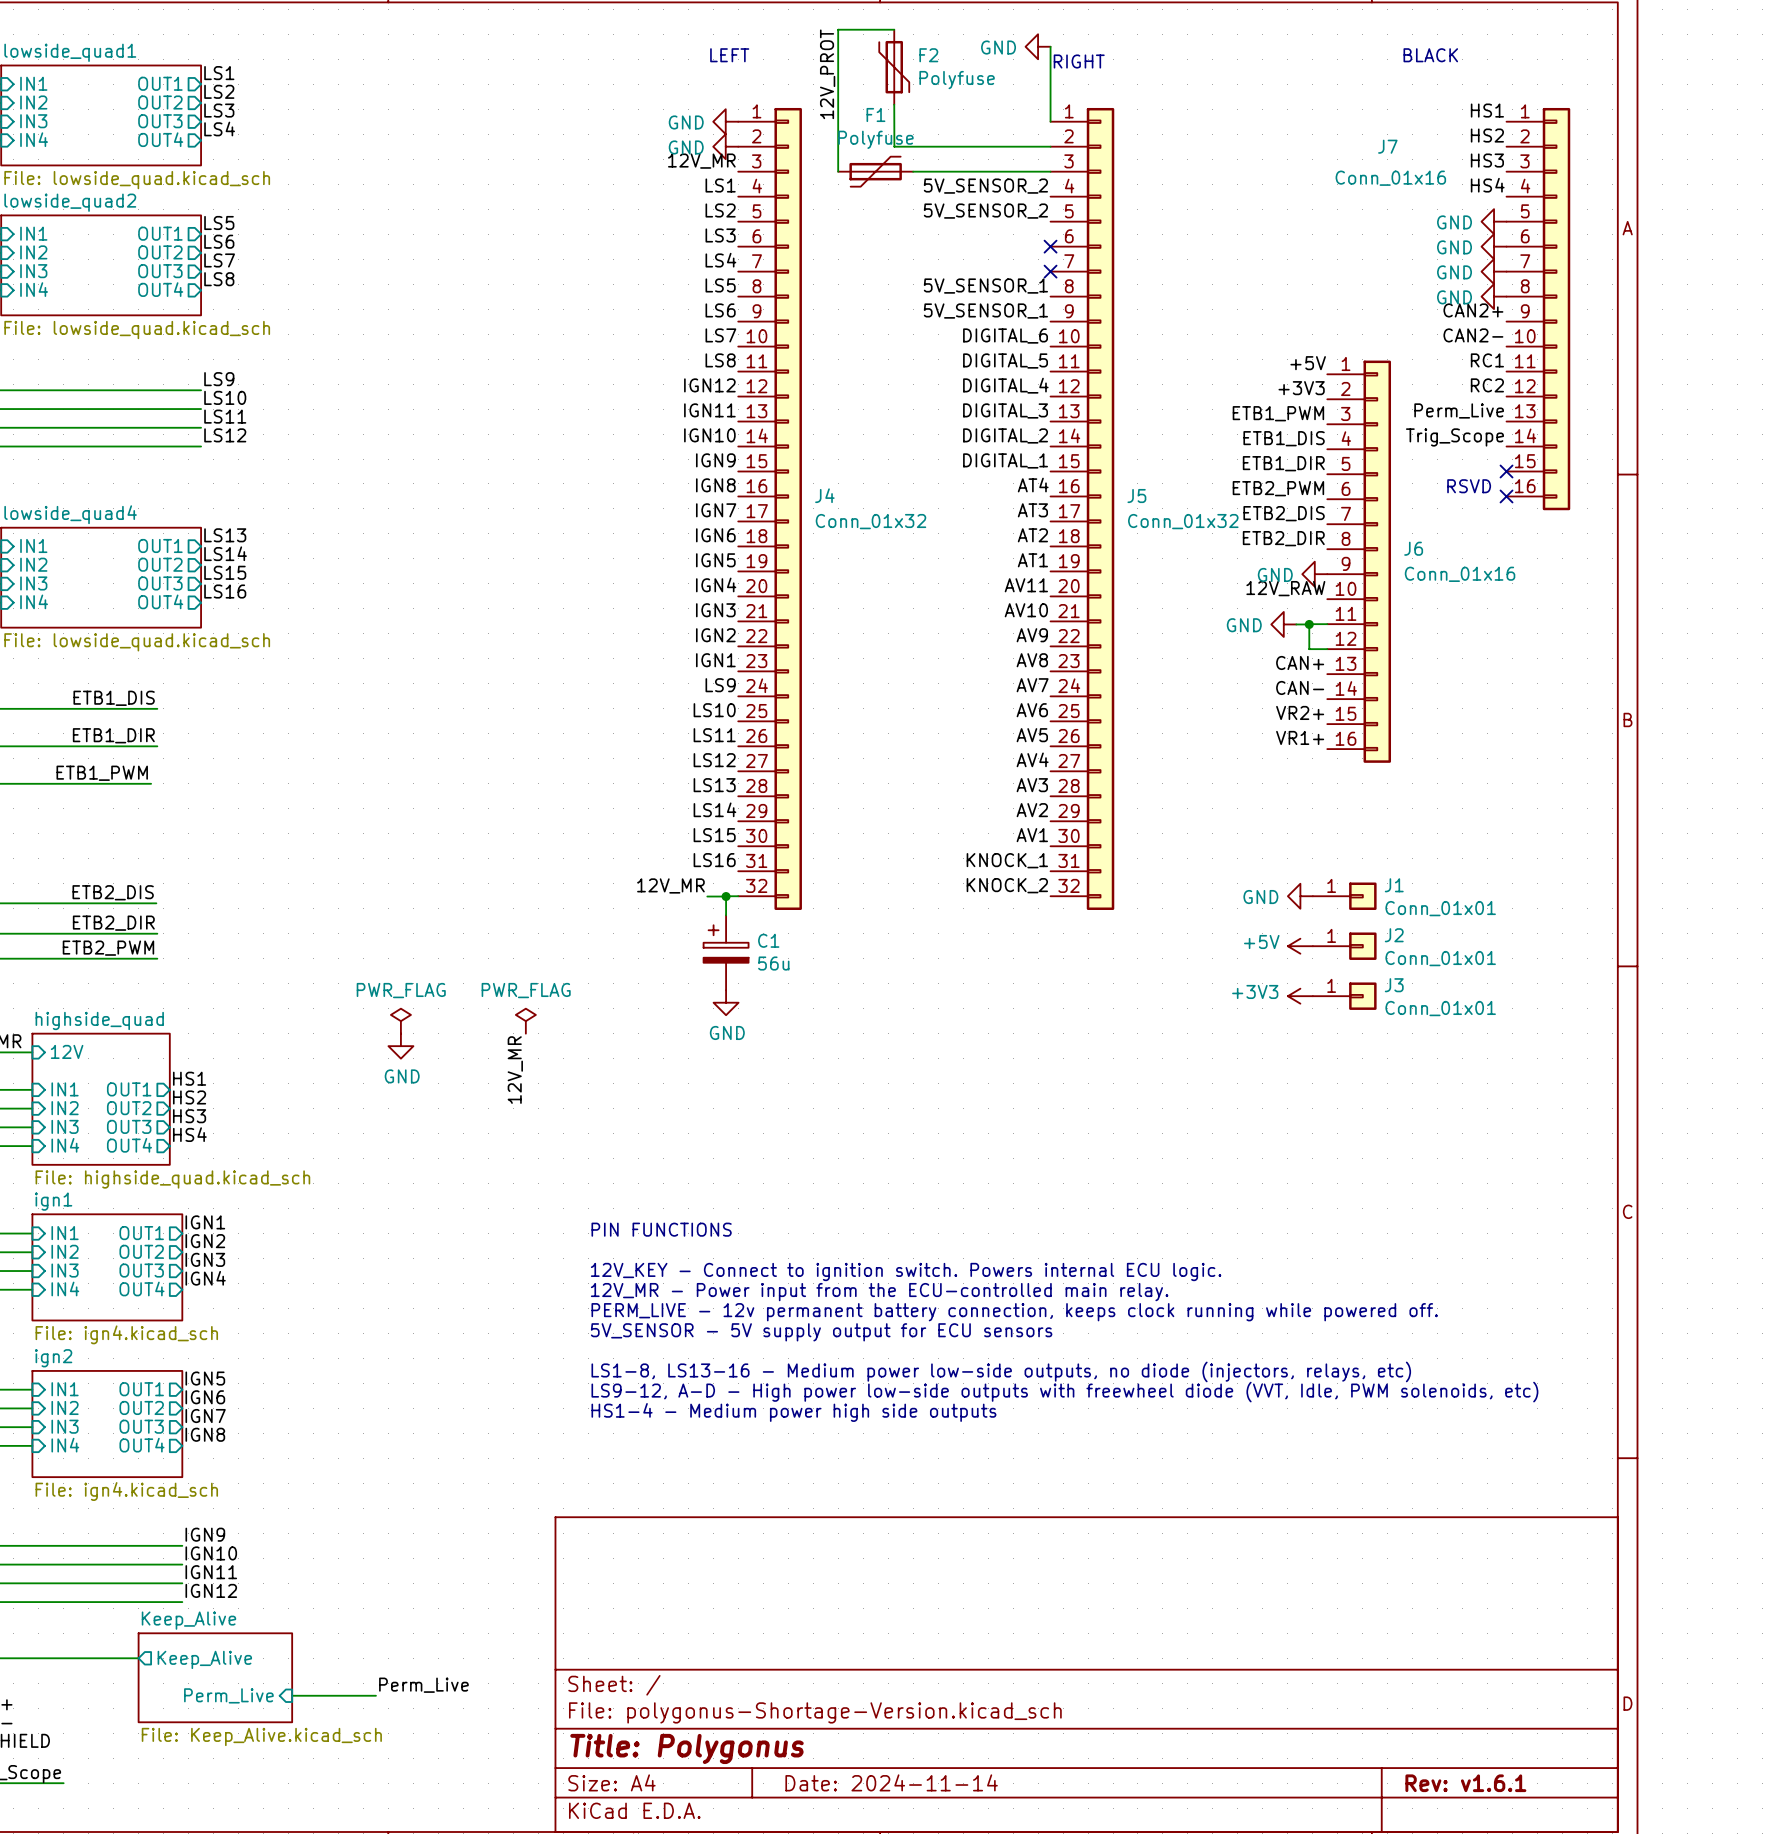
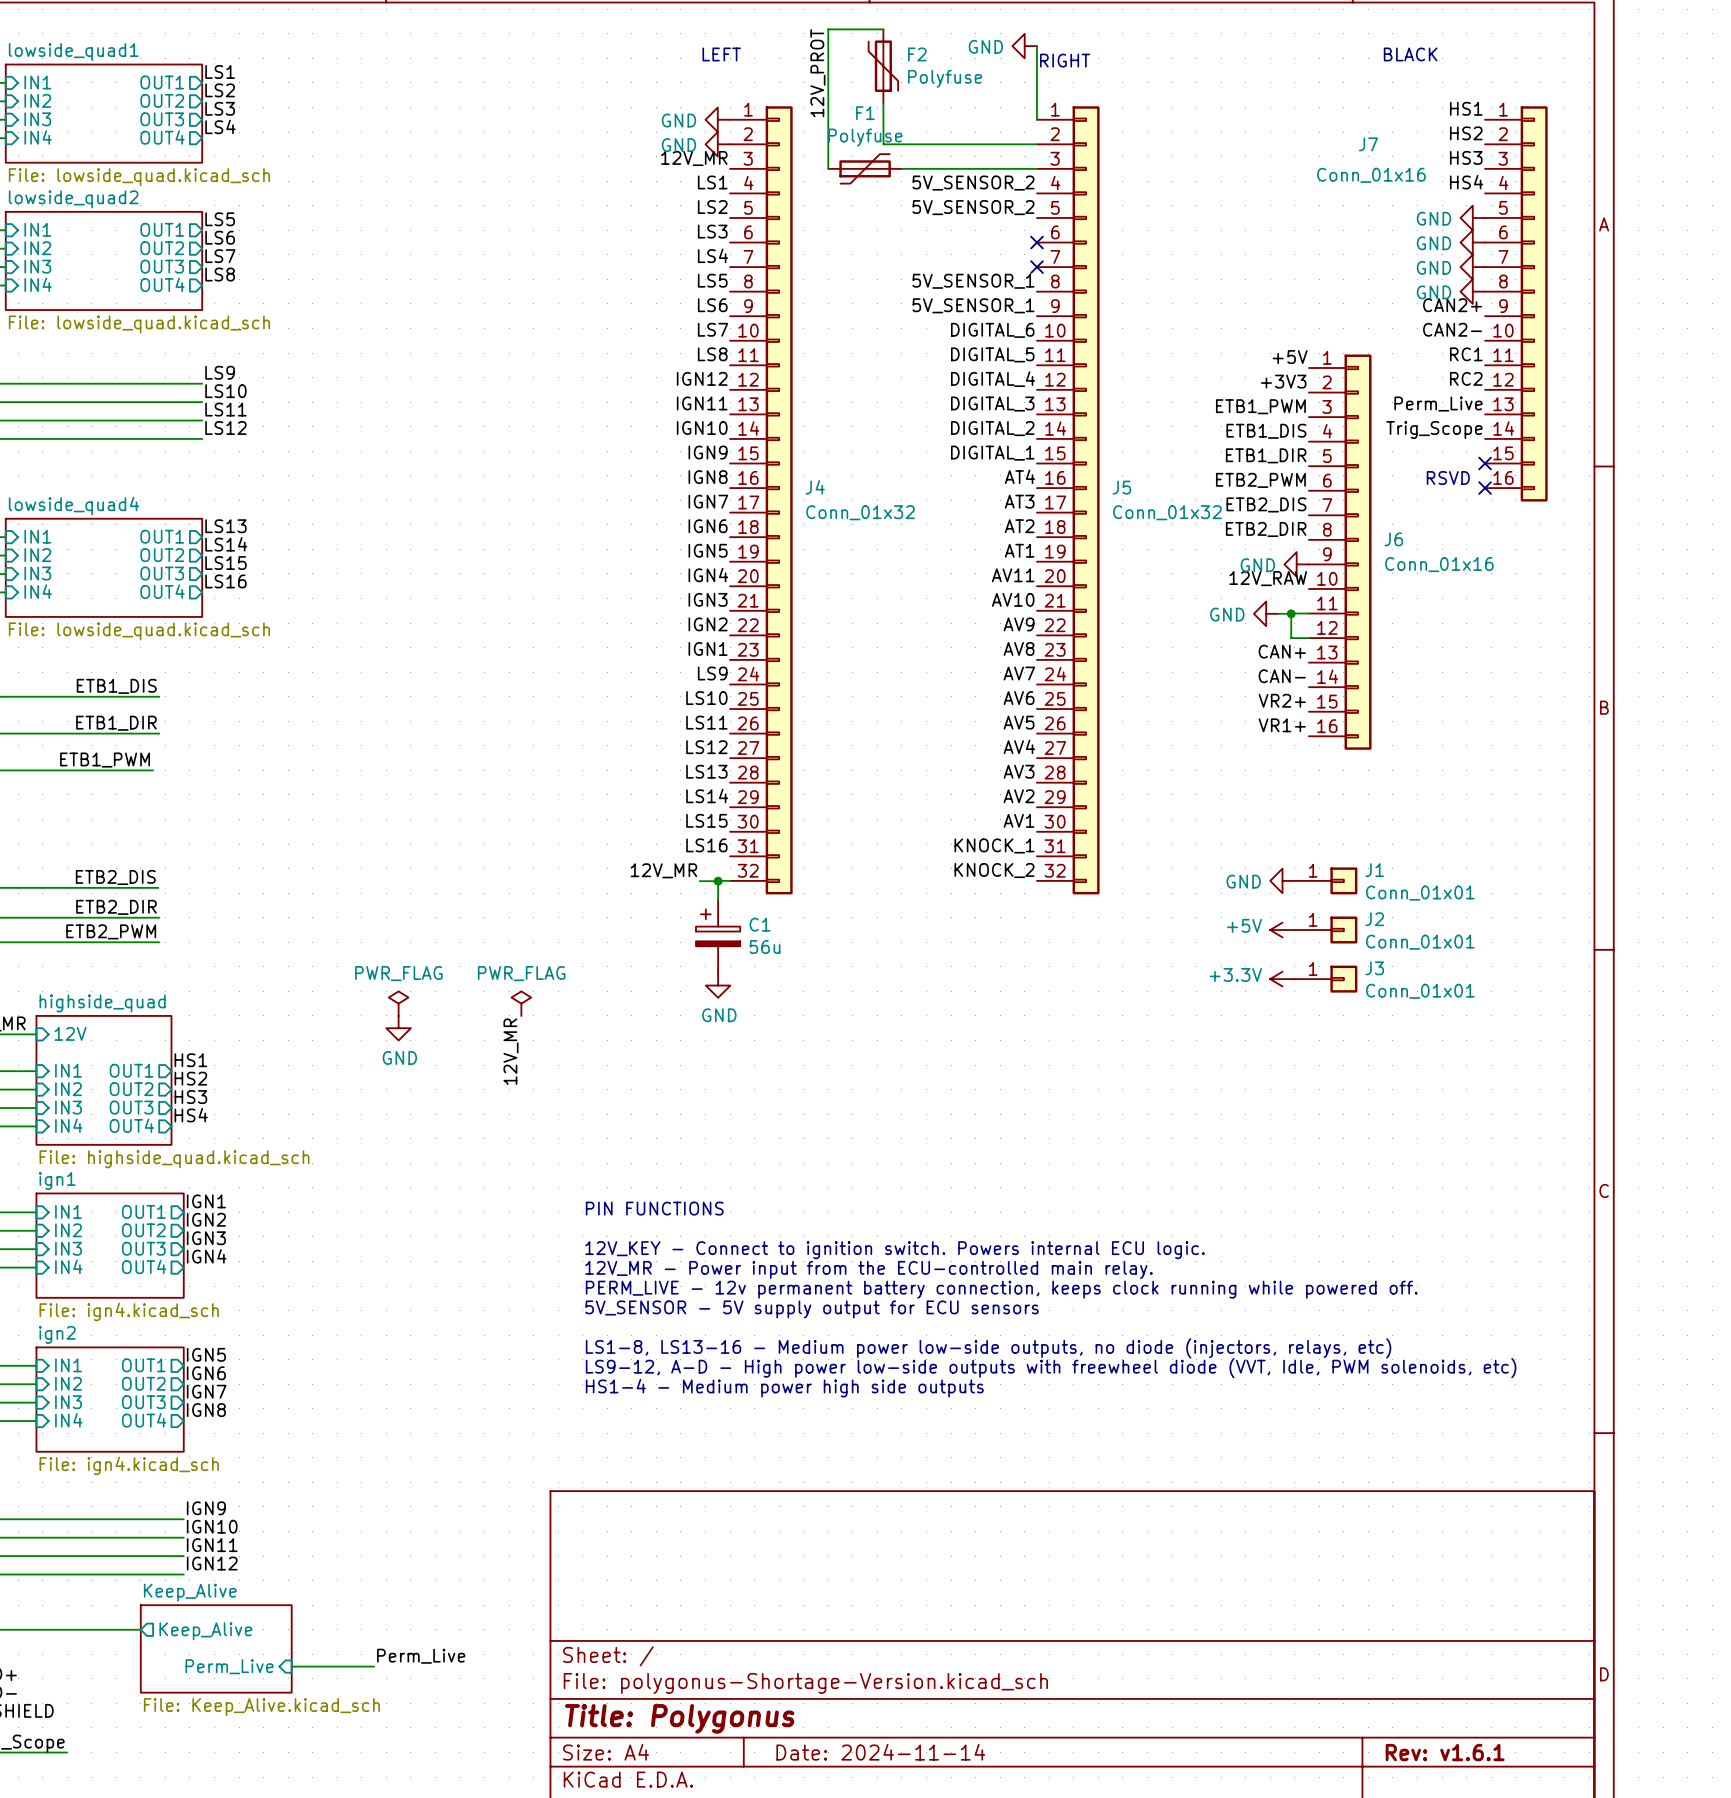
power symbol: +3V3 (1300, 996) -> +3.3V (1282, 979)

